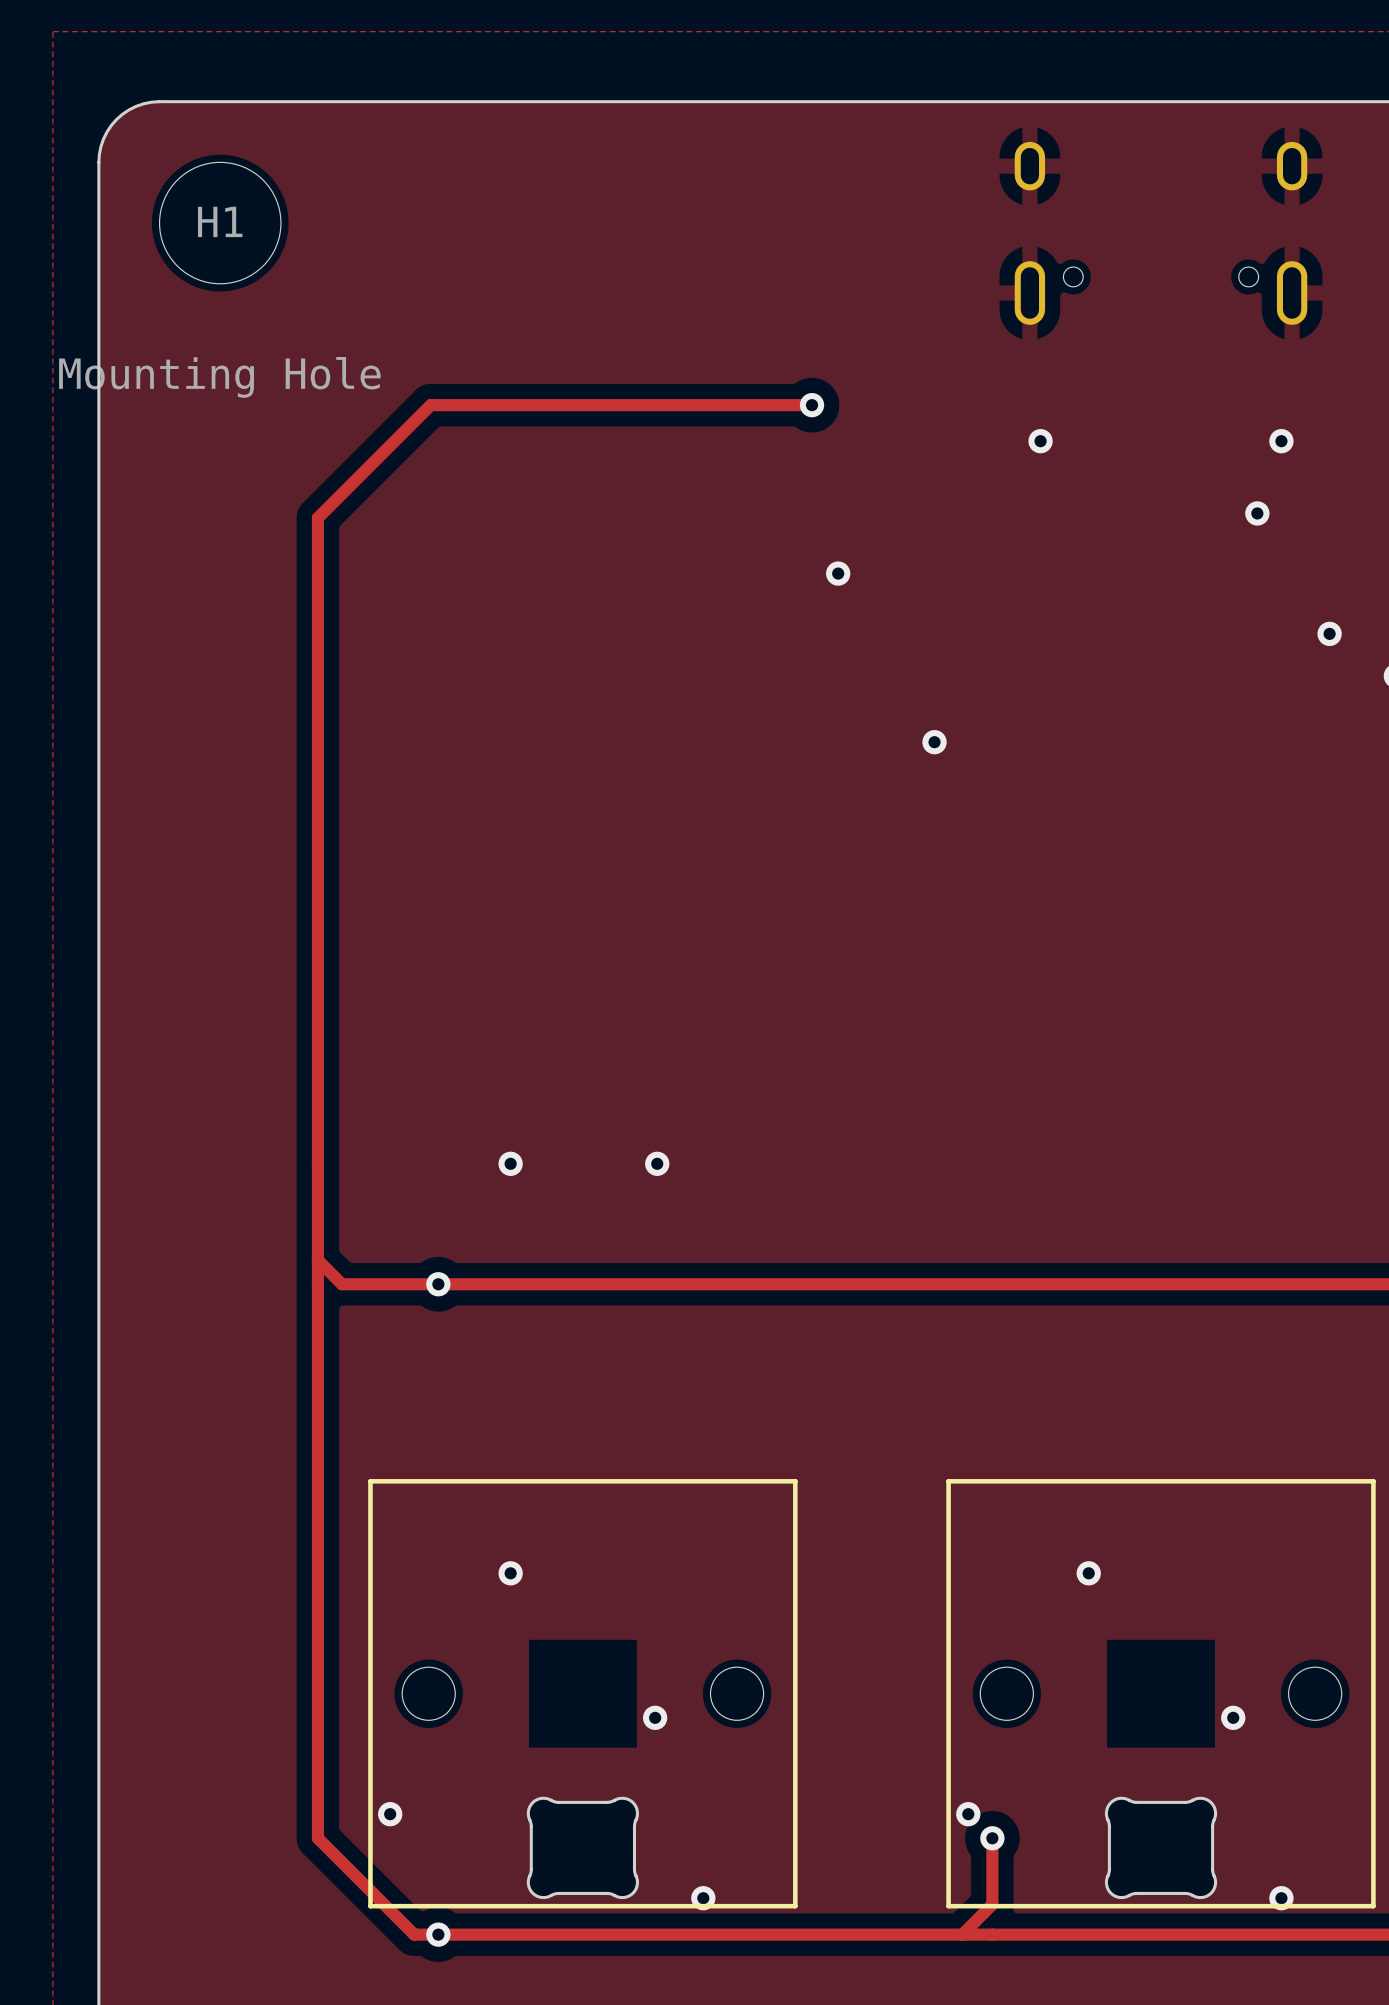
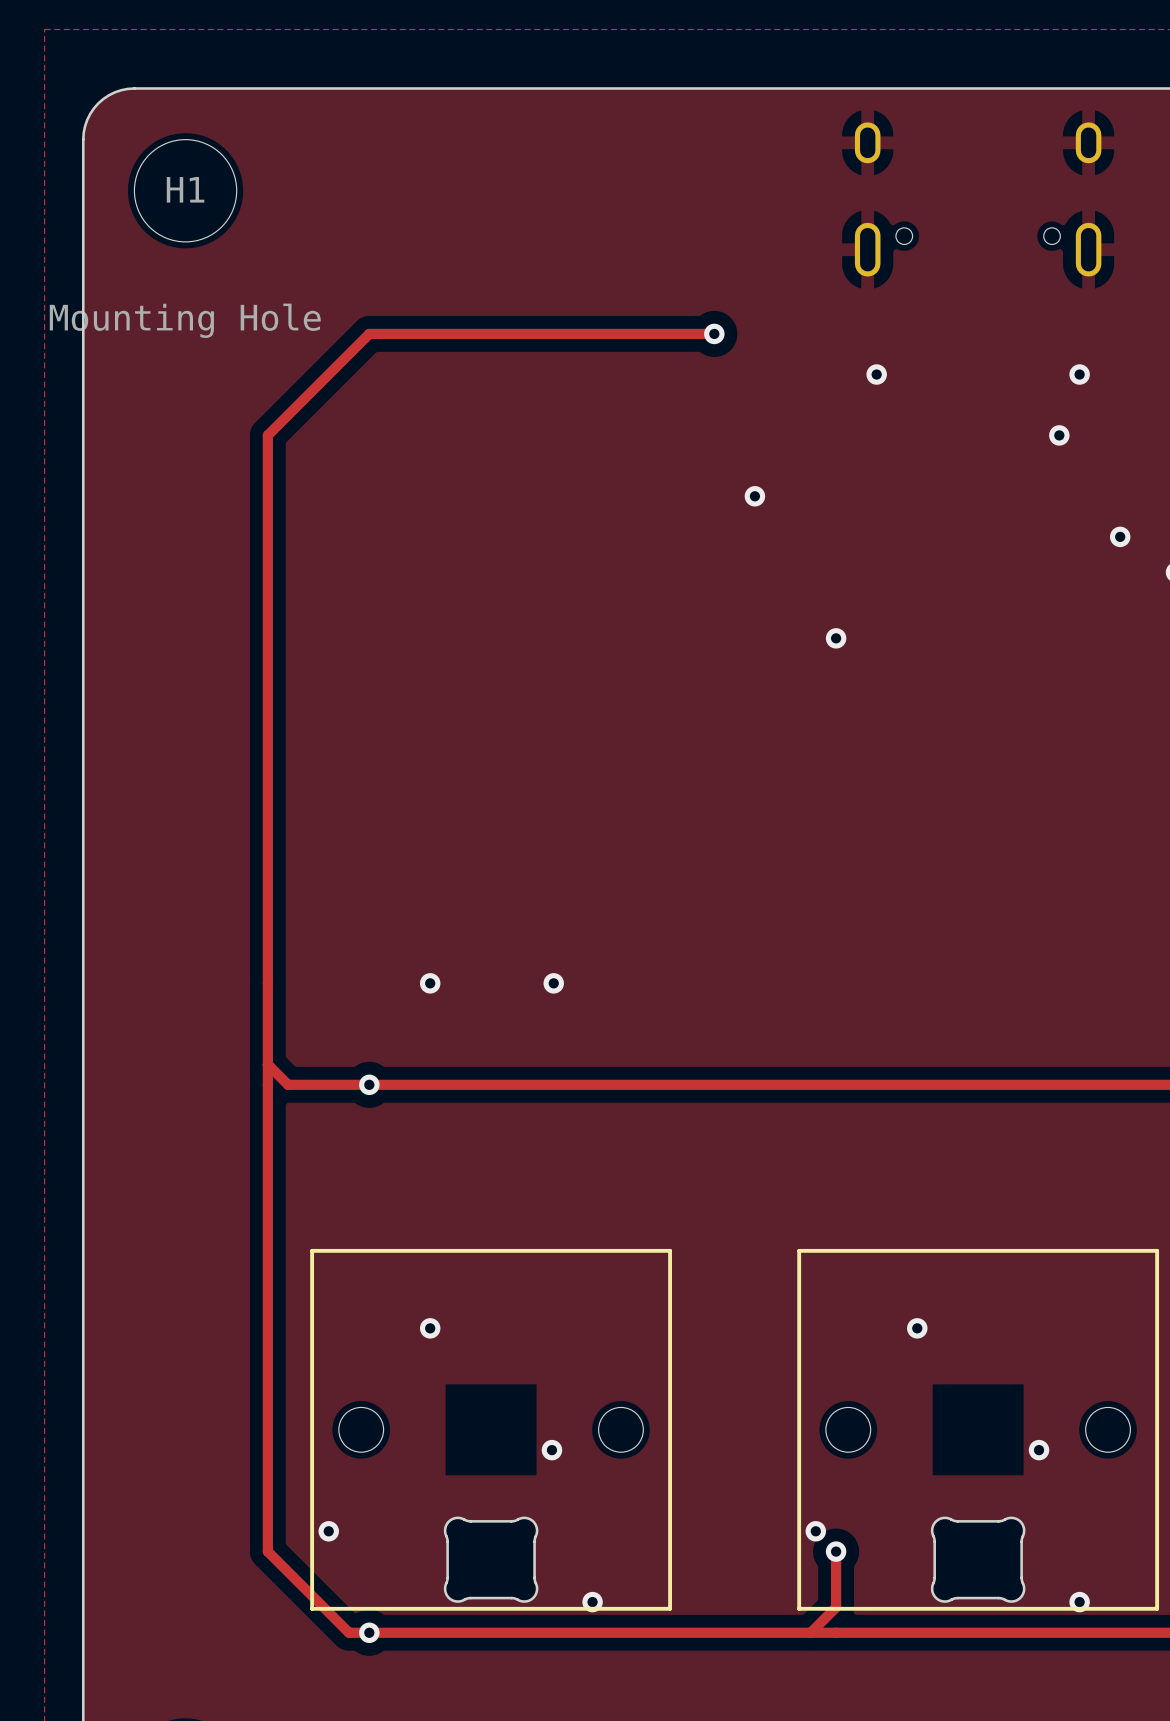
track: (812, 405) (430, 405) (317, 517) -> (714, 333) (369, 333) (267, 435) (267, 439)
via position: (812, 405) -> (714, 333)
via position: (838, 573) -> (754, 496)
via position: (934, 742) -> (836, 638)

